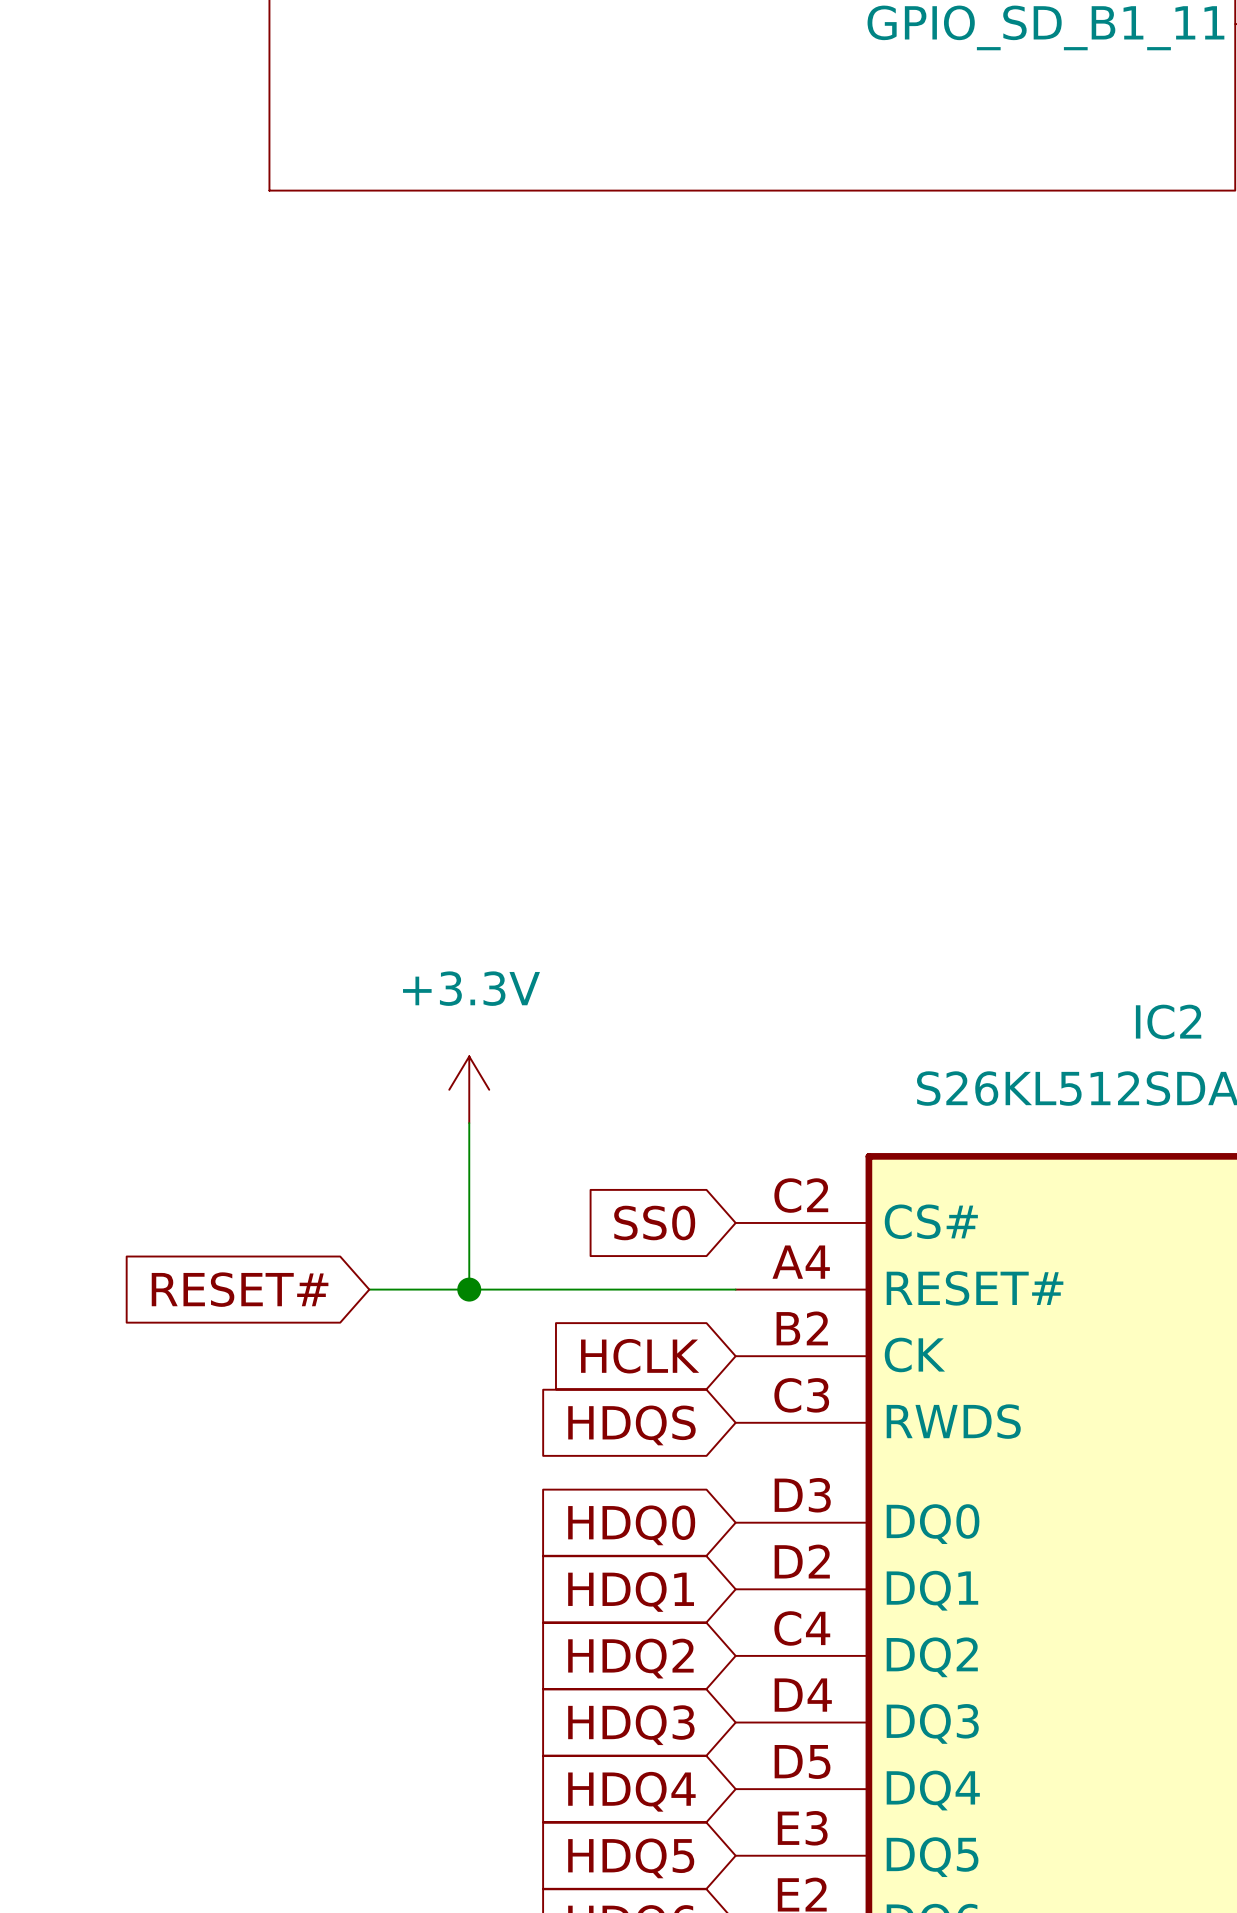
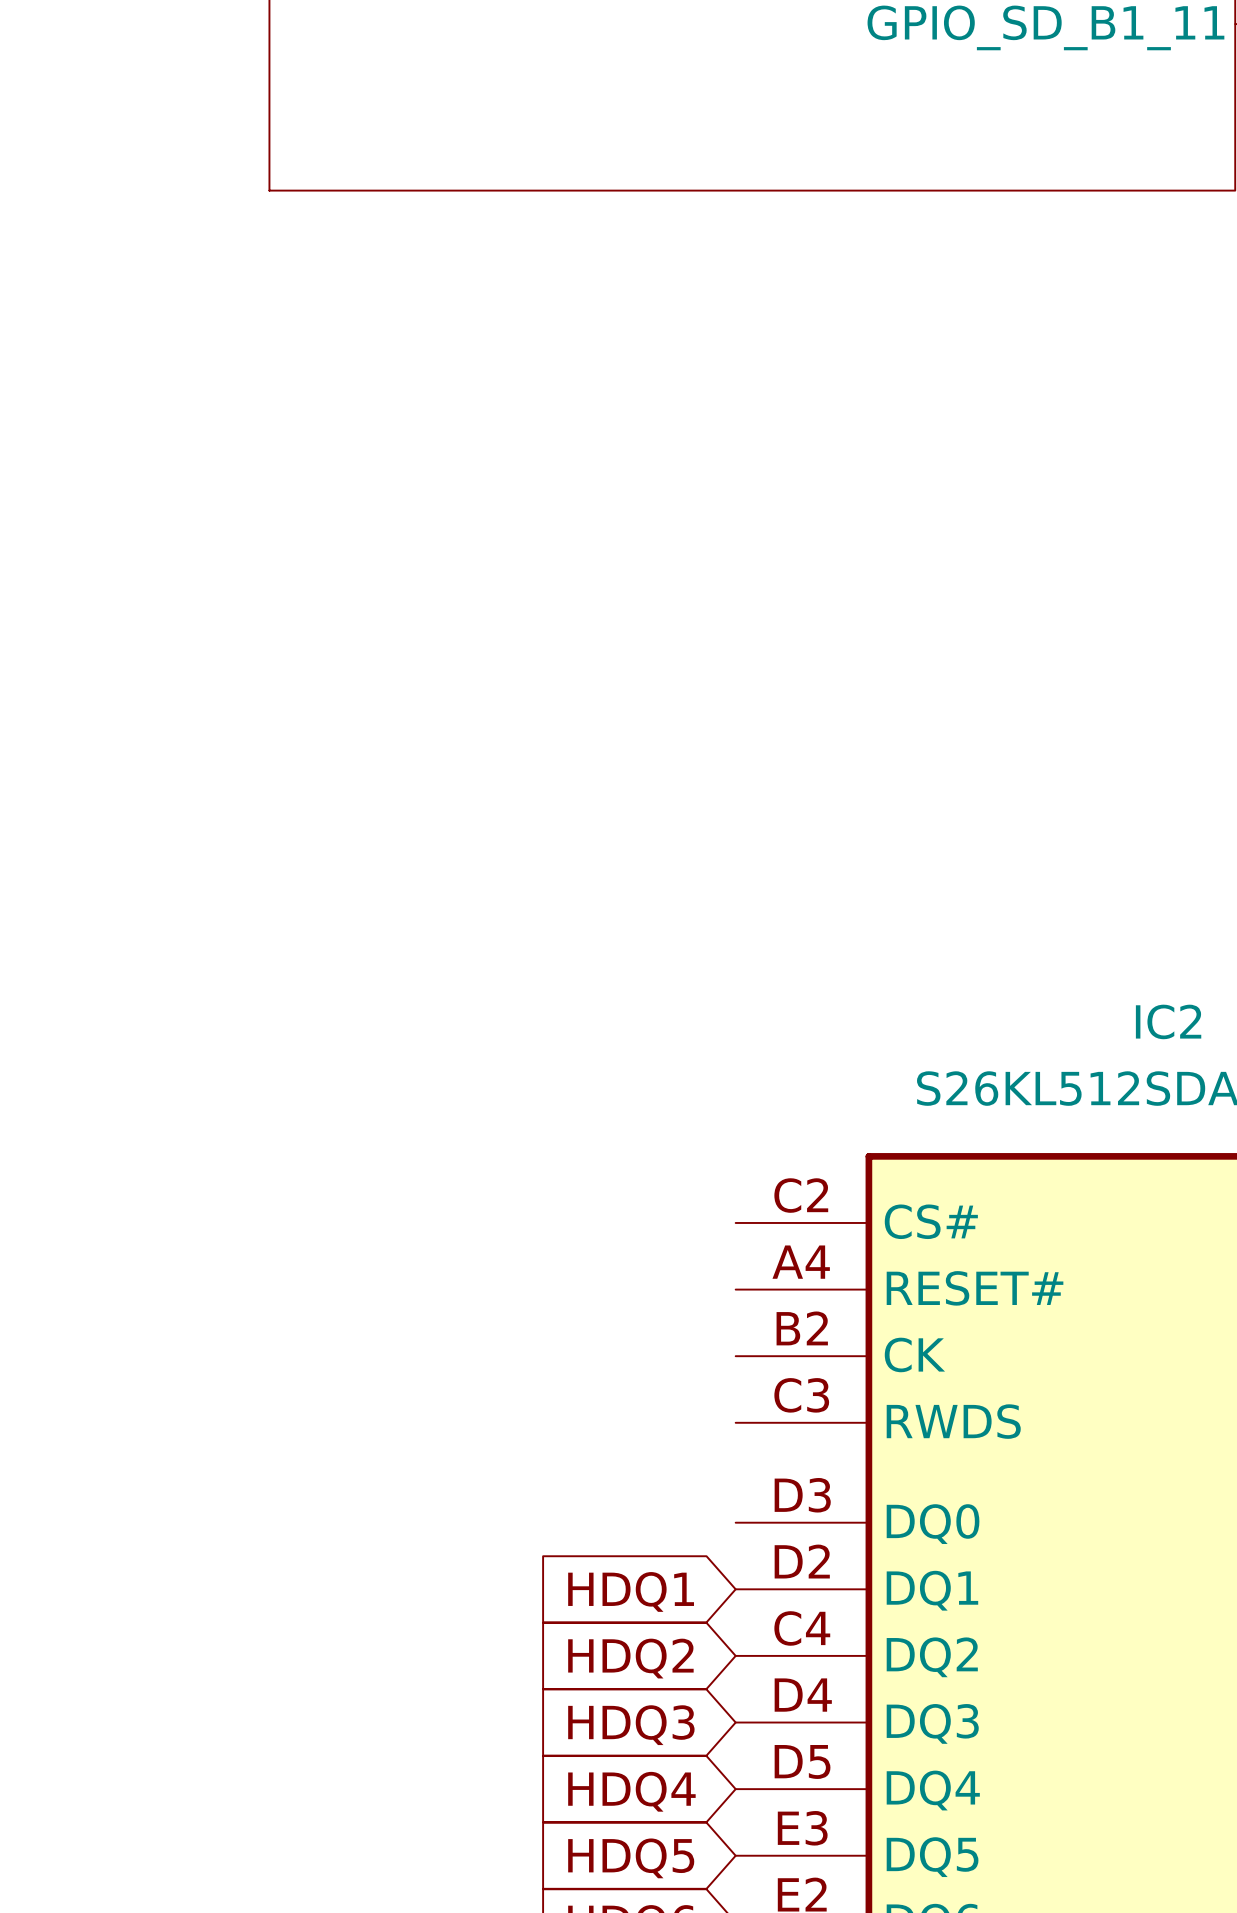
power symbol: +3.3V (469, 1089) -> none
wire: (469, 1123) (469, 1289) -> none
global label: SS0 (654, 1223) -> none
global label: RESET# (240, 1289) -> none
wire: (369, 1289) (735, 1289) -> none
junction: (469, 1289) -> none
global label: HCLK (640, 1356) -> none
global label: HDQS (631, 1425) -> none
global label: HDQ0 (631, 1525) -> none

